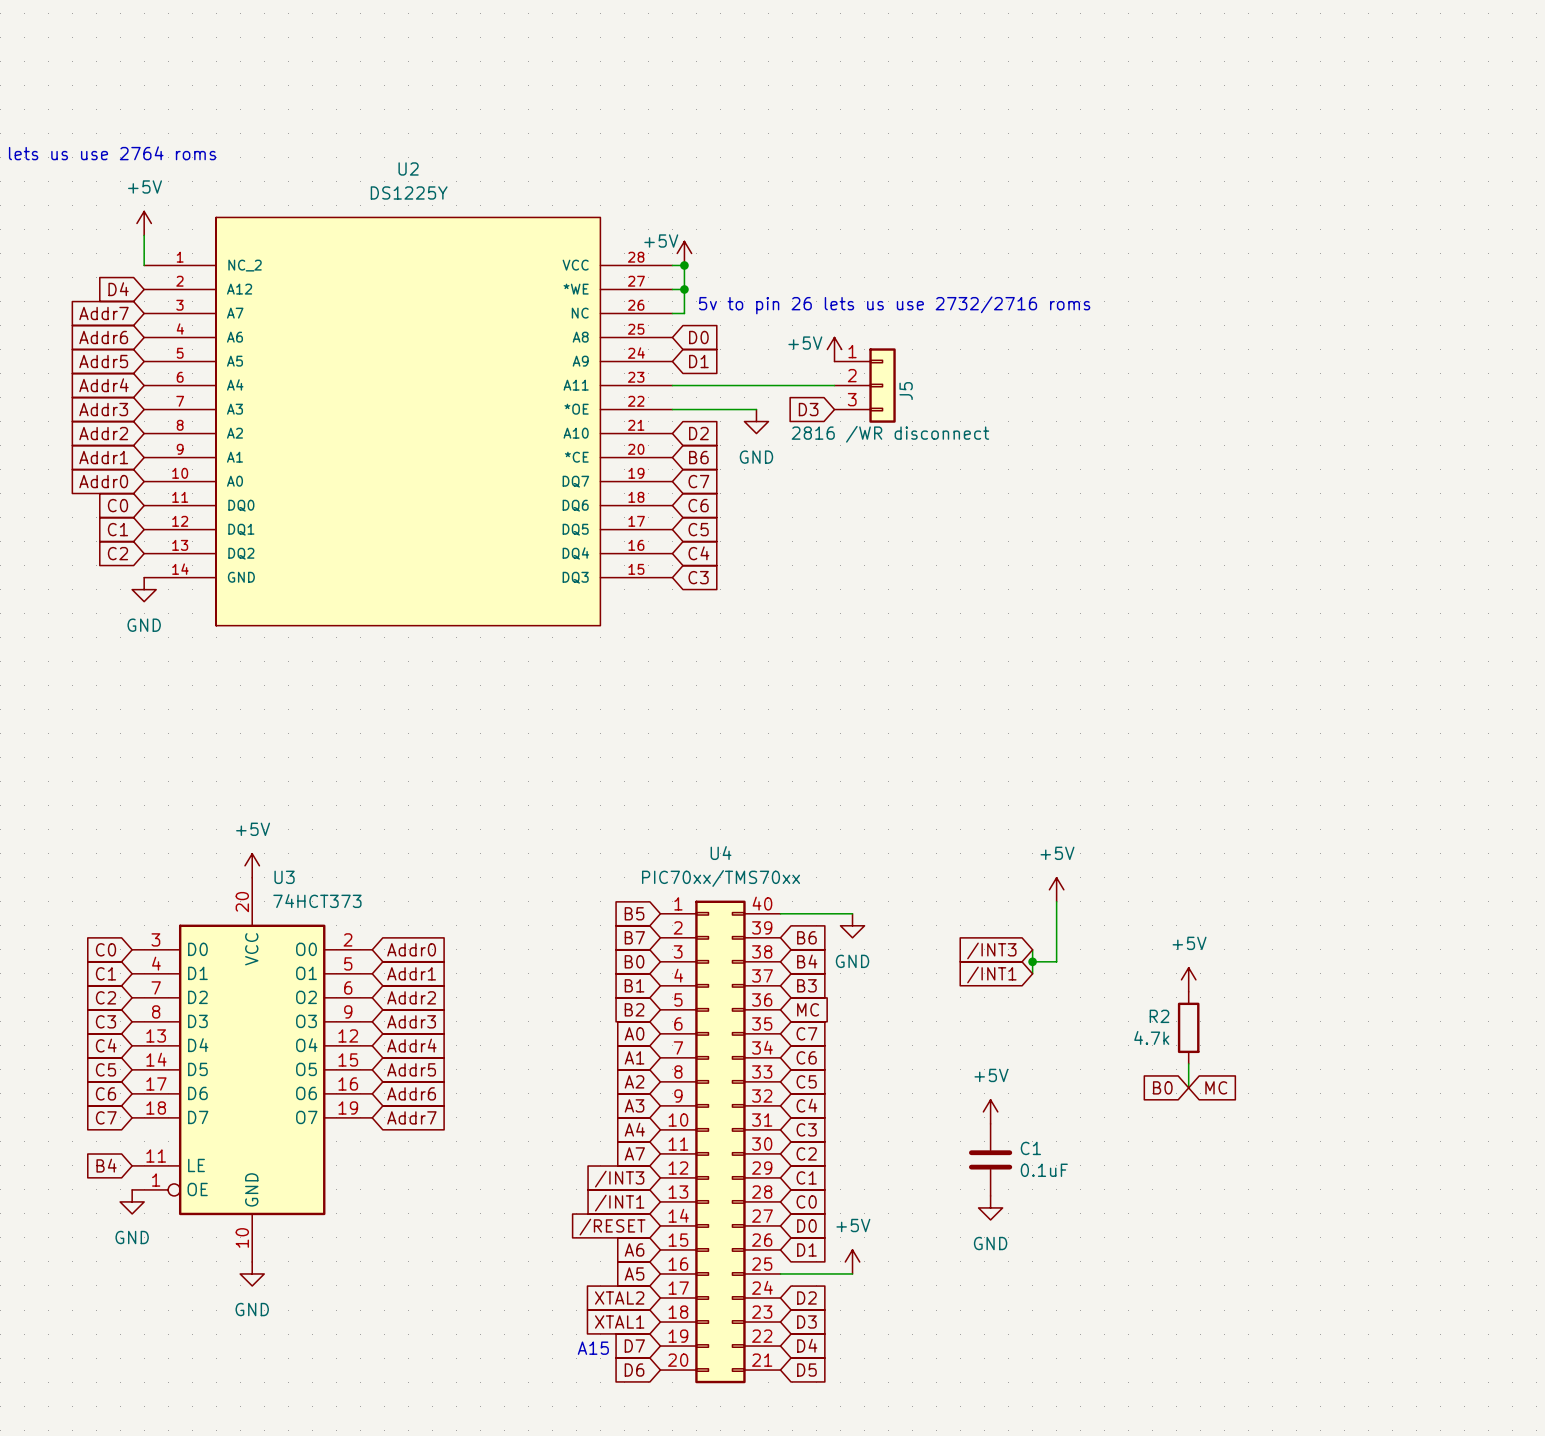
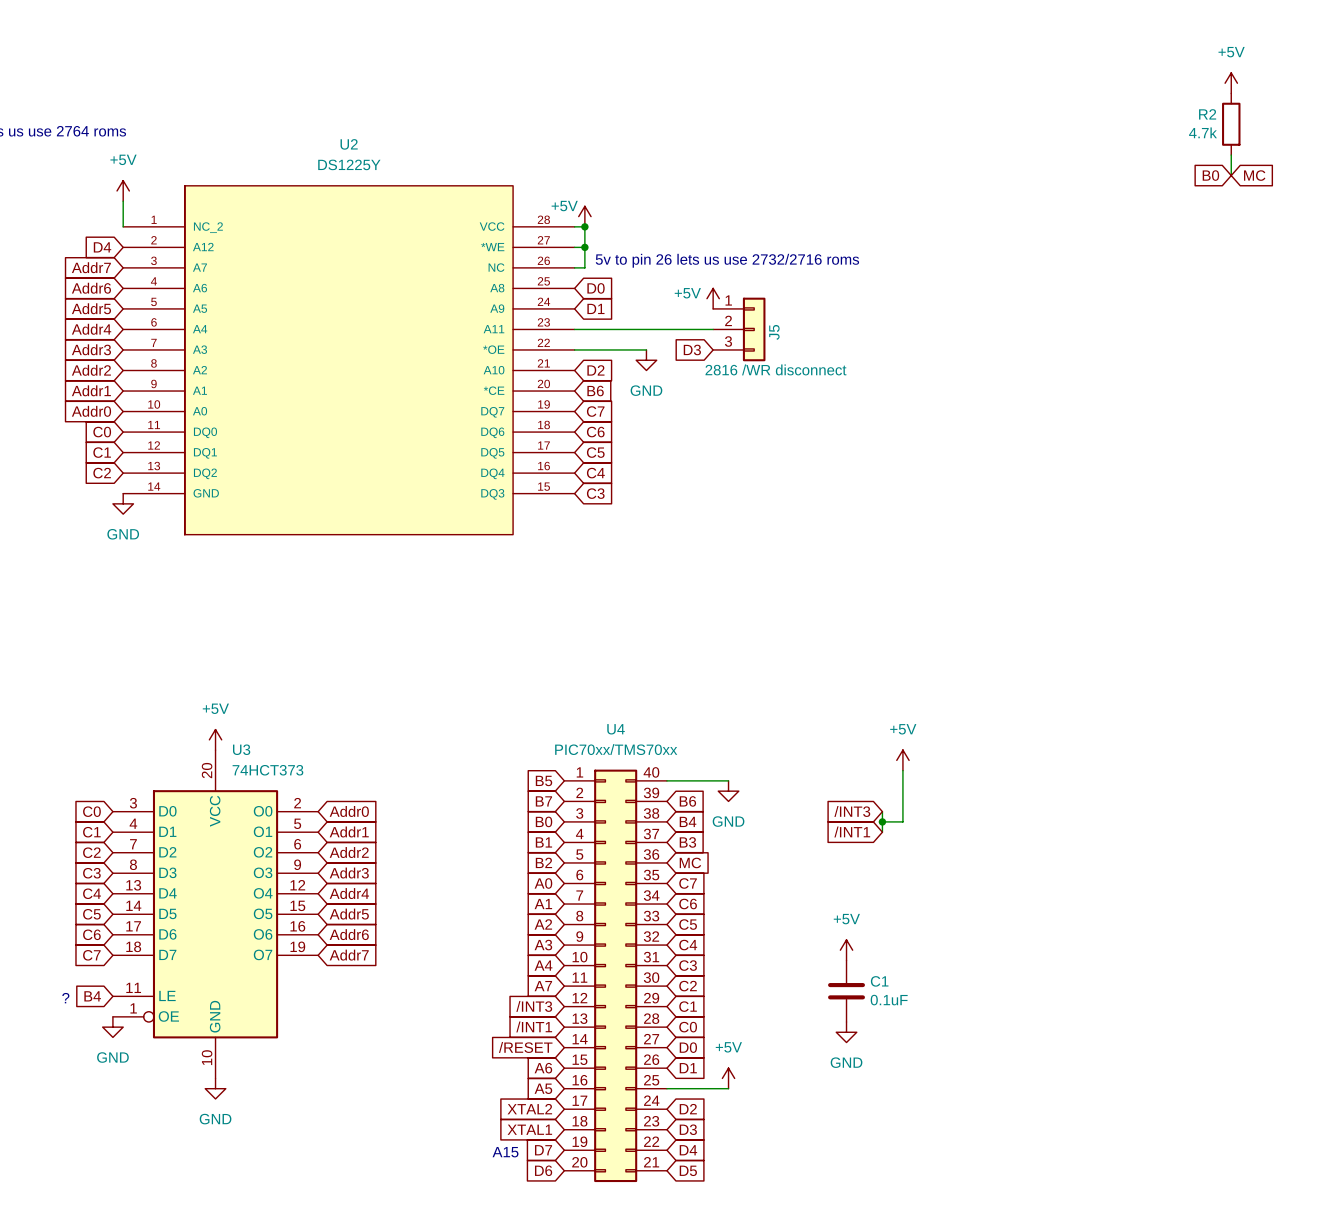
power symbol: none -> +5V (1231, 83)
wire: none -> (1231, 155) (1231, 175)
global label: none -> B0 (1210, 175)
global label: none -> MC (1254, 175)
power symbol: +5V (1188, 979) -> none
R2 position: (1188, 1027) -> (1231, 124)
wire: (1188, 1063) (1188, 1087) -> none
global label: B0 (1162, 1087) -> none
global label: MC (1216, 1087) -> none
text: none -> ? (65, 998)

